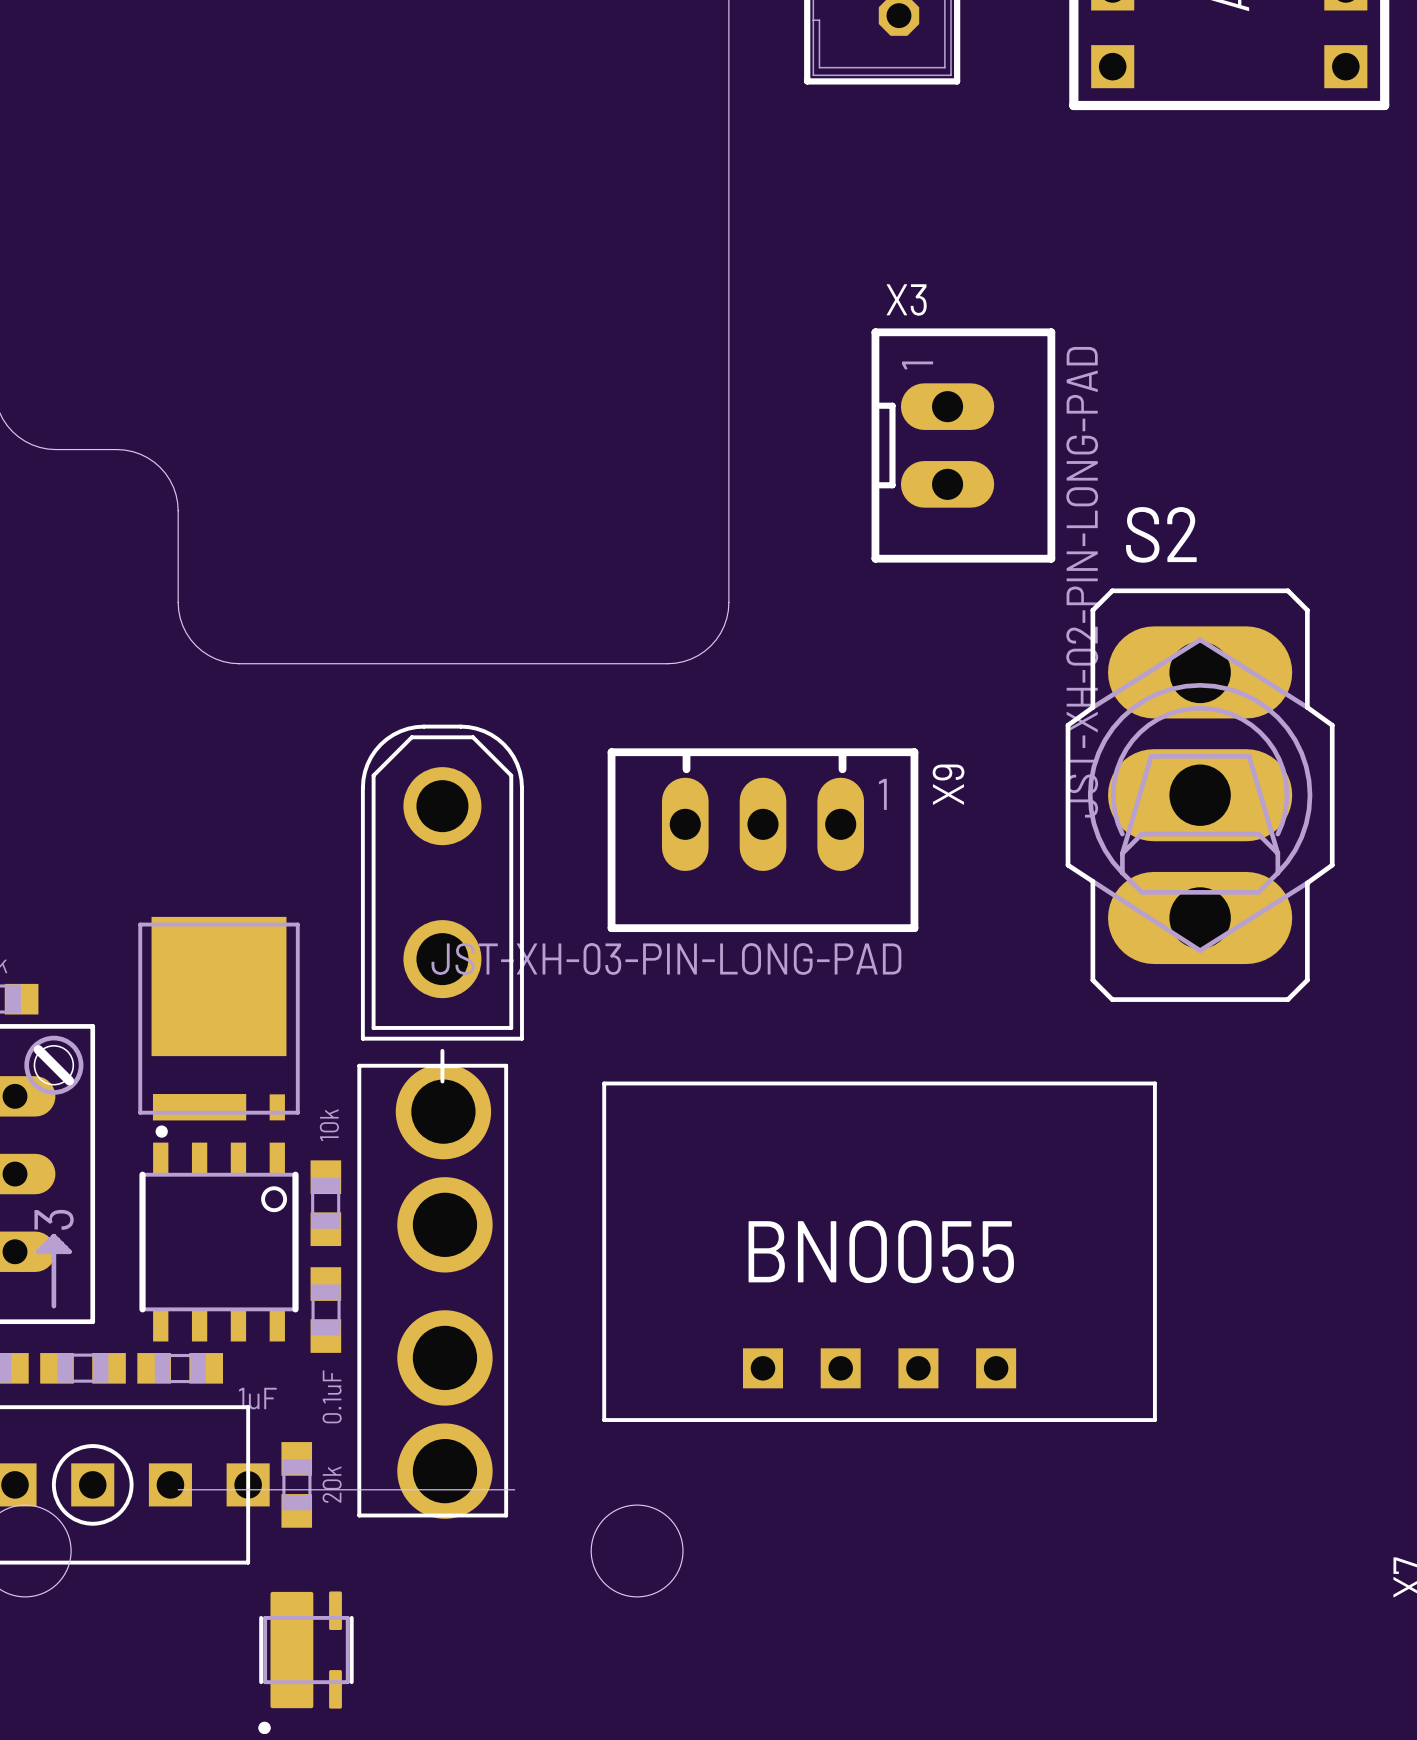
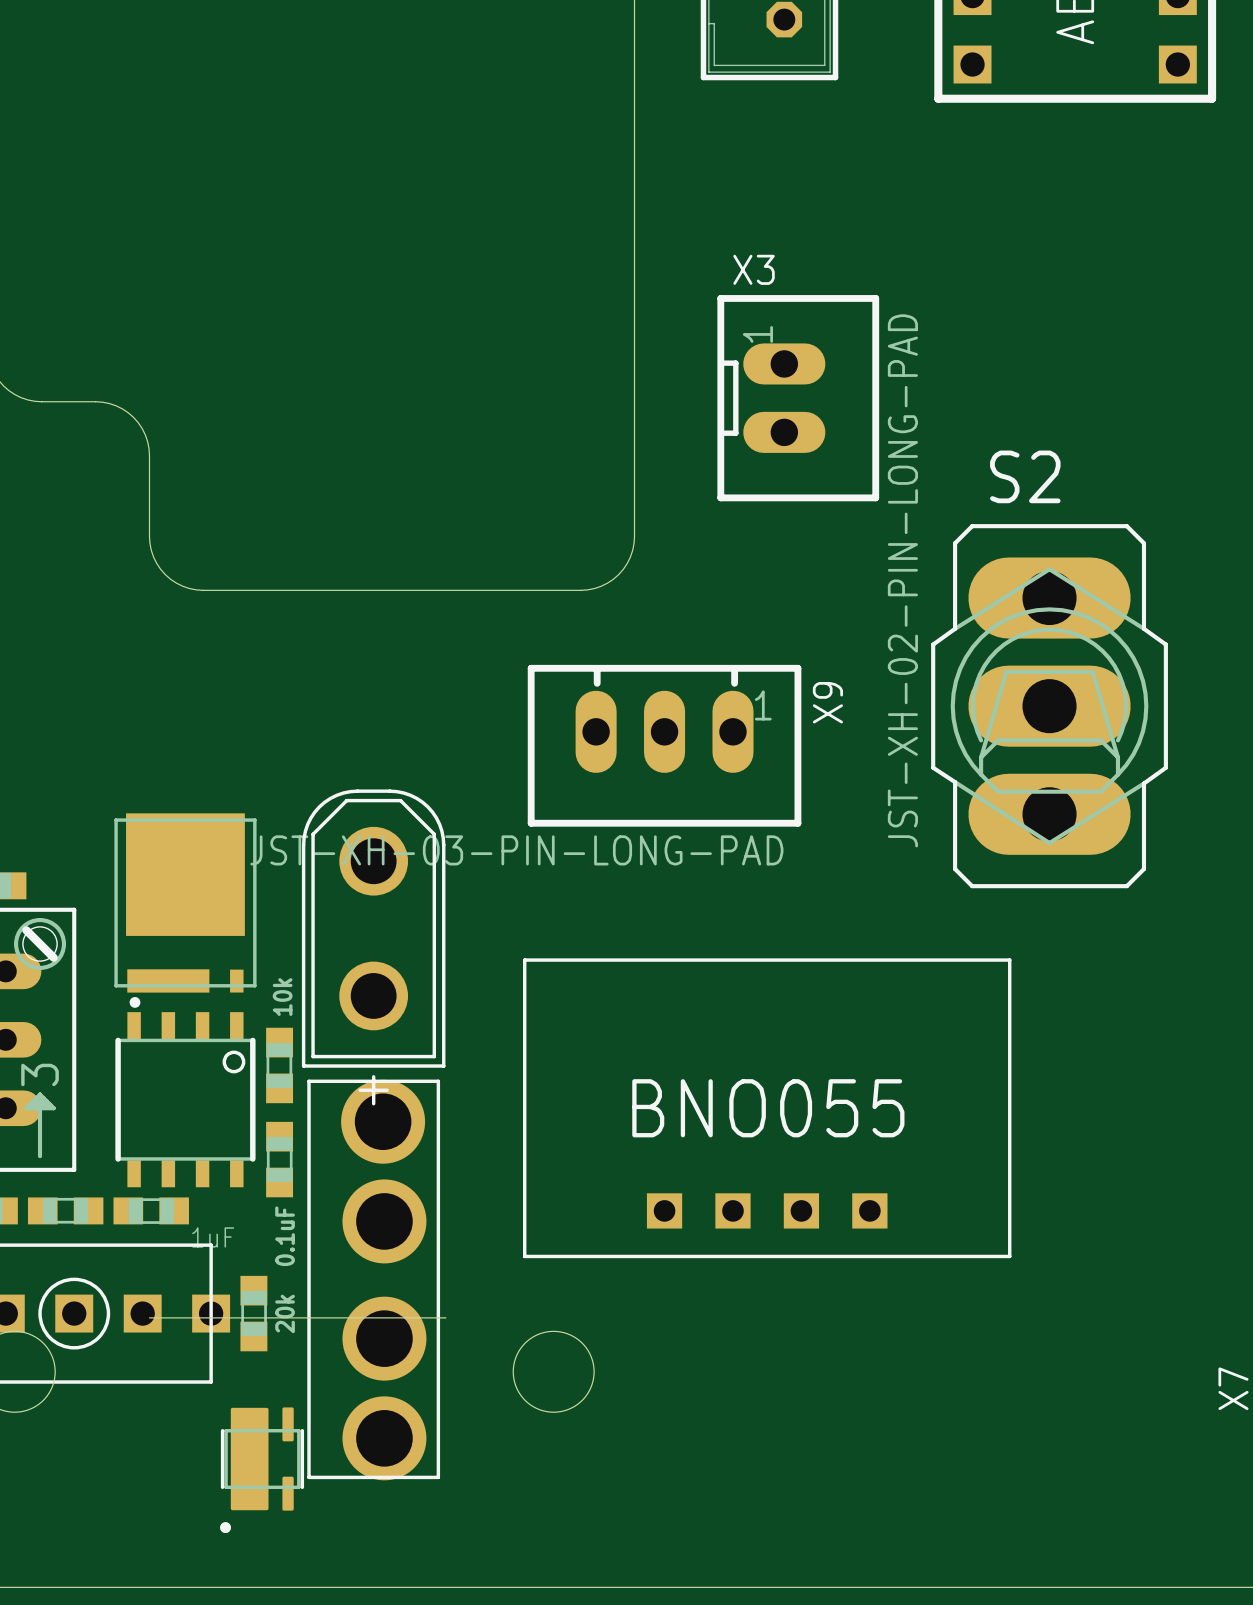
X3 position: (963, 445) -> (798, 398)
part position: (442, 904) -> (373, 947)
part position: (432, 1291) -> (373, 1279)

